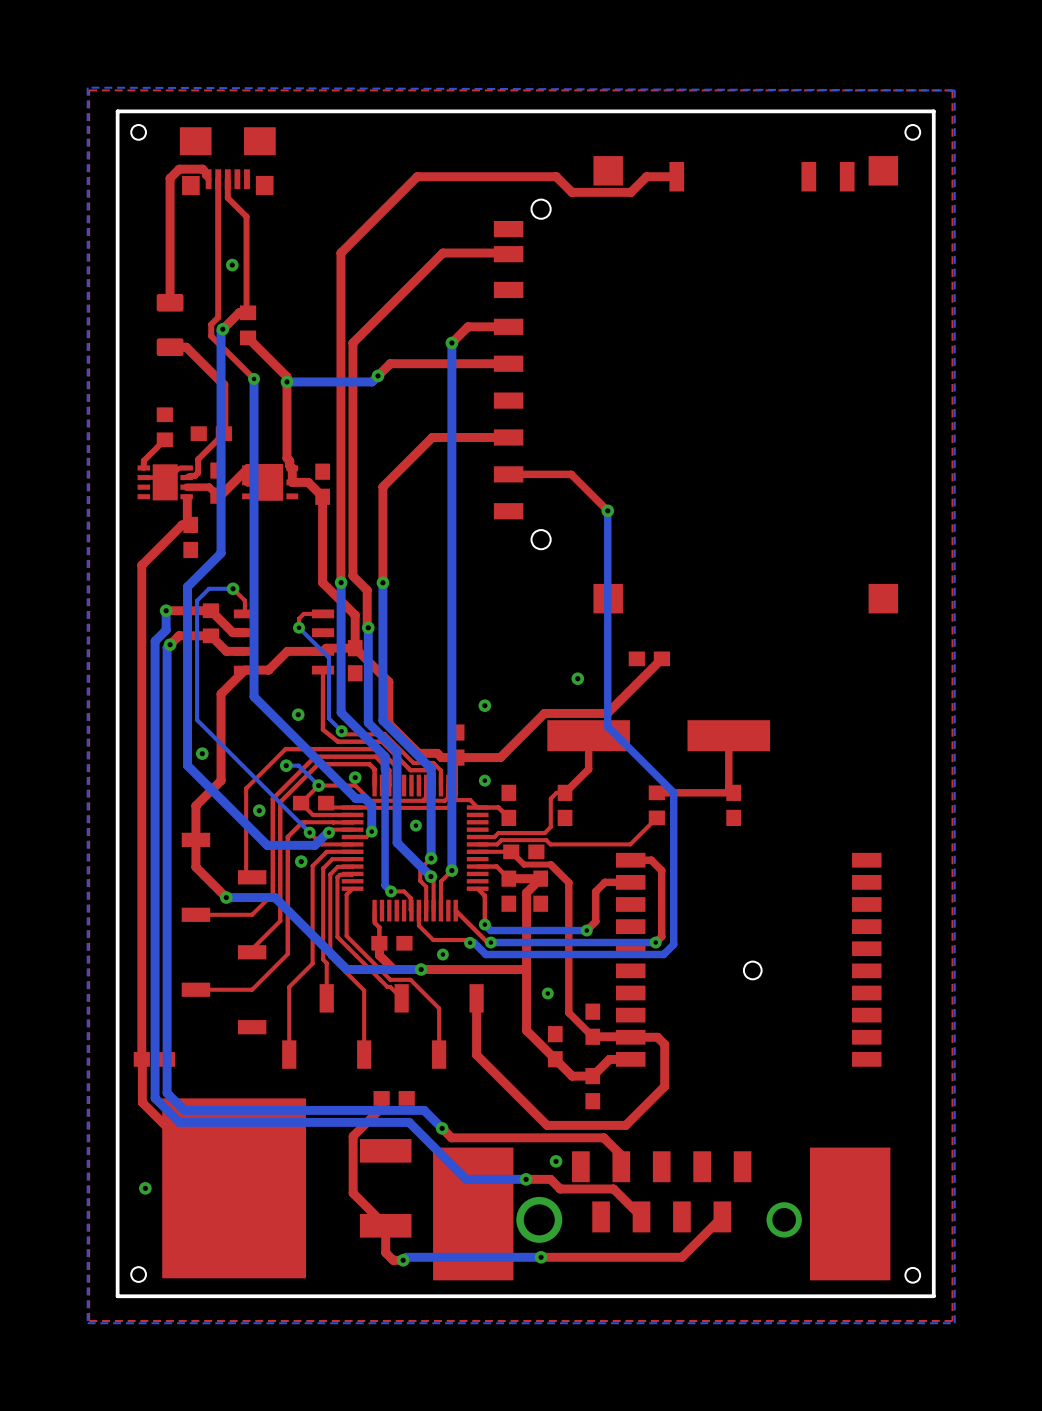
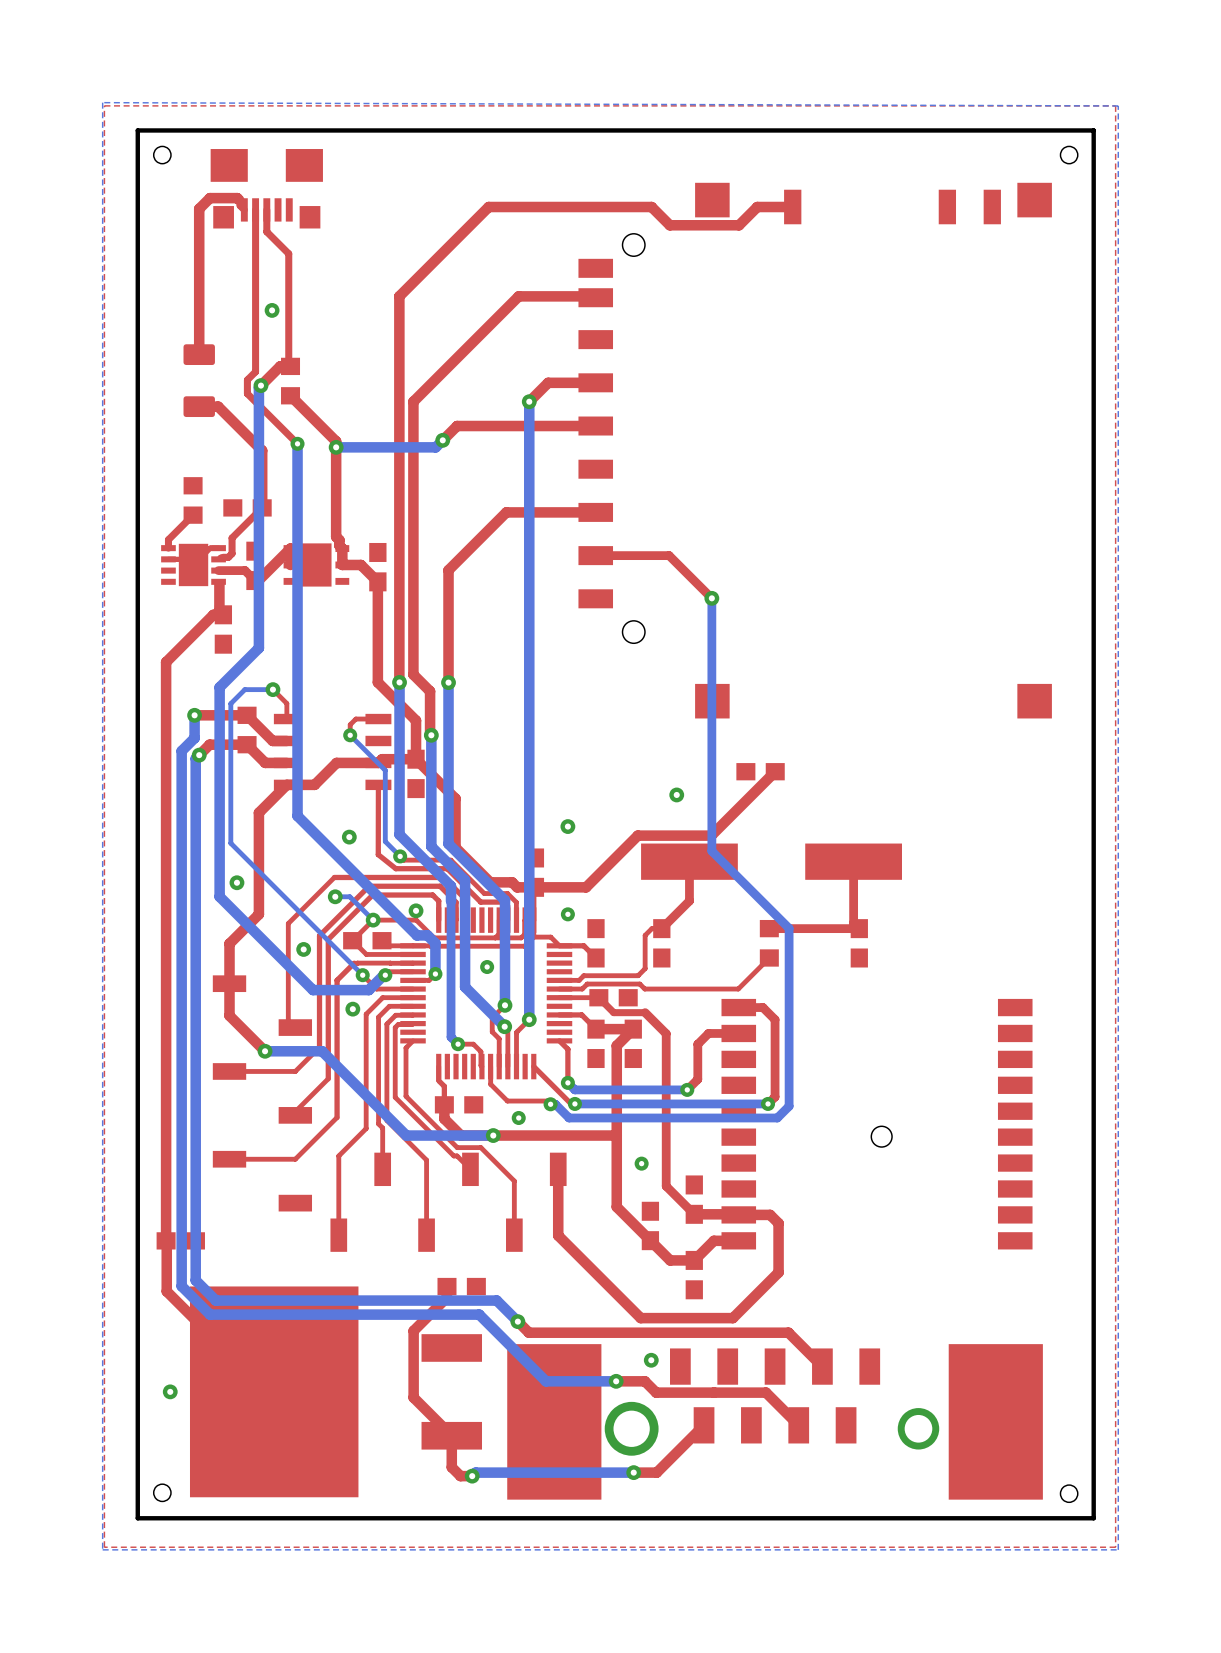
top track: (603, 1137) (621, 1155) (621, 1166) -> (707, 1332) (788, 1332) (822, 1366)
top track: (613, 1188) (641, 1216) -> (718, 1392) (766, 1392) (798, 1425)
top track: (722, 1216) (681, 1257) (560, 1257) -> (704, 1425) (656, 1472)

